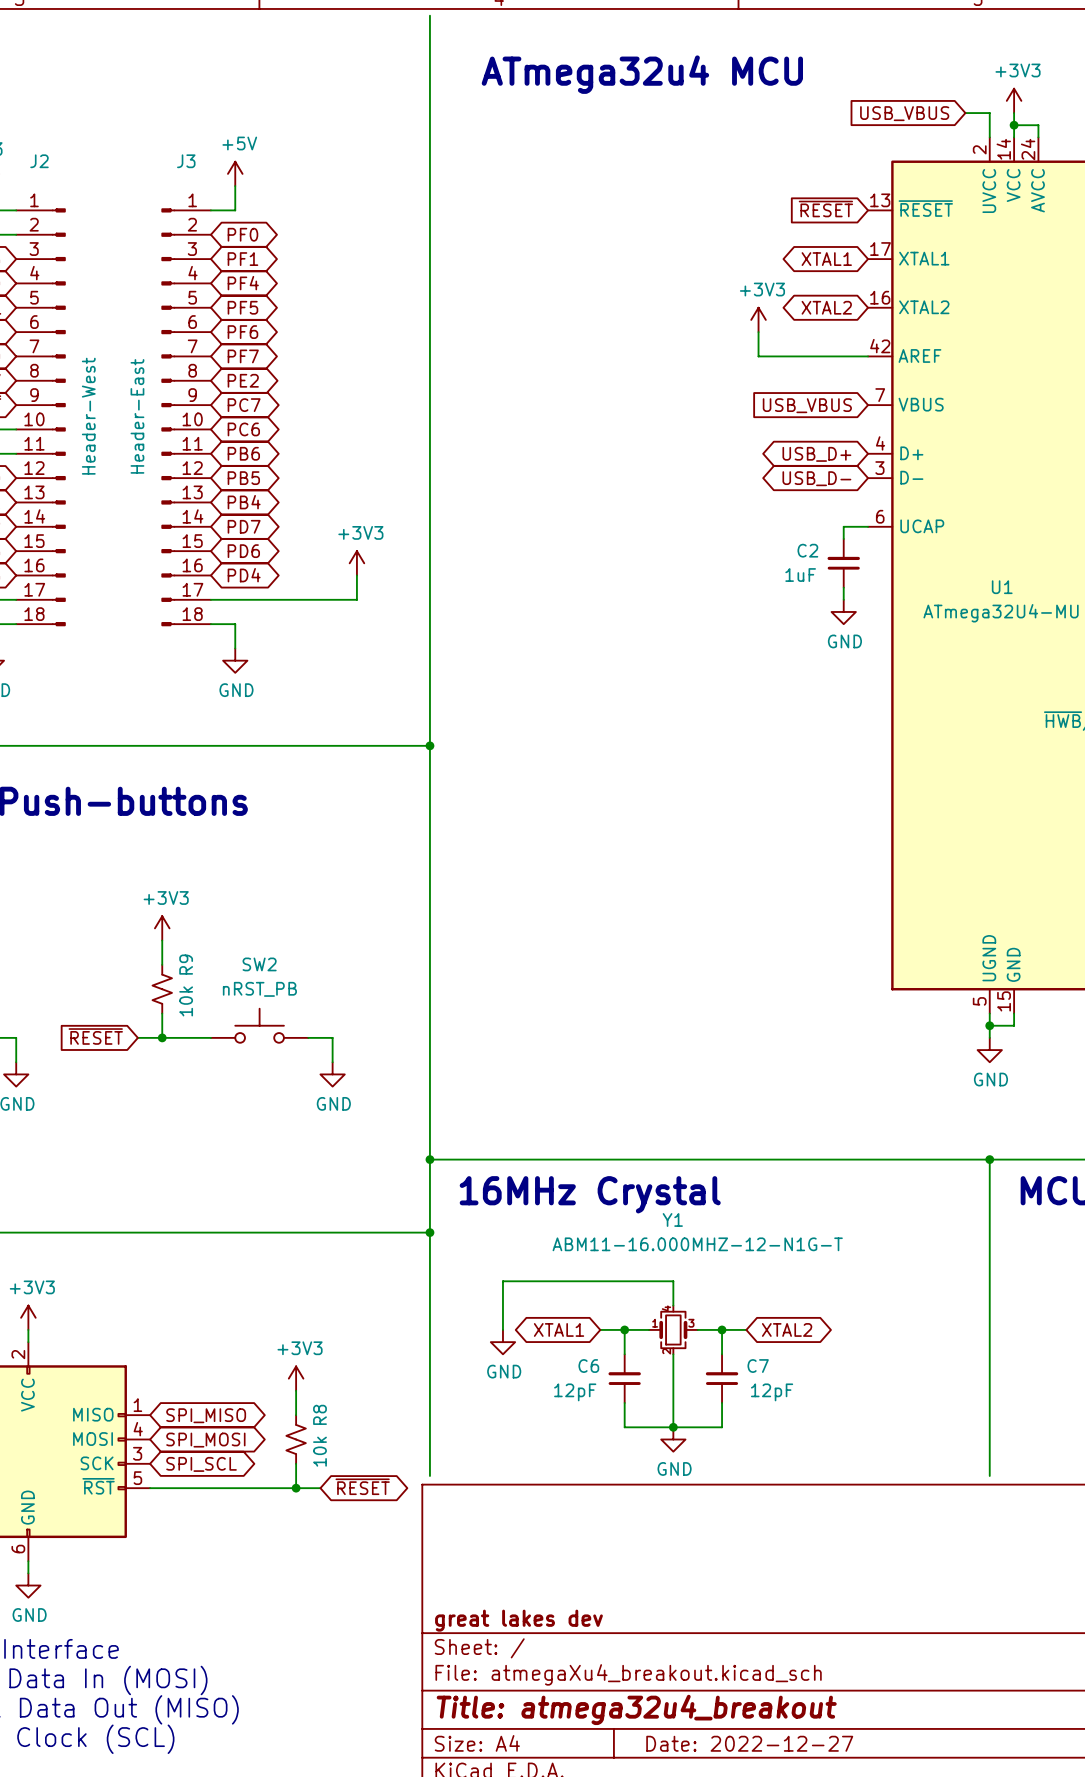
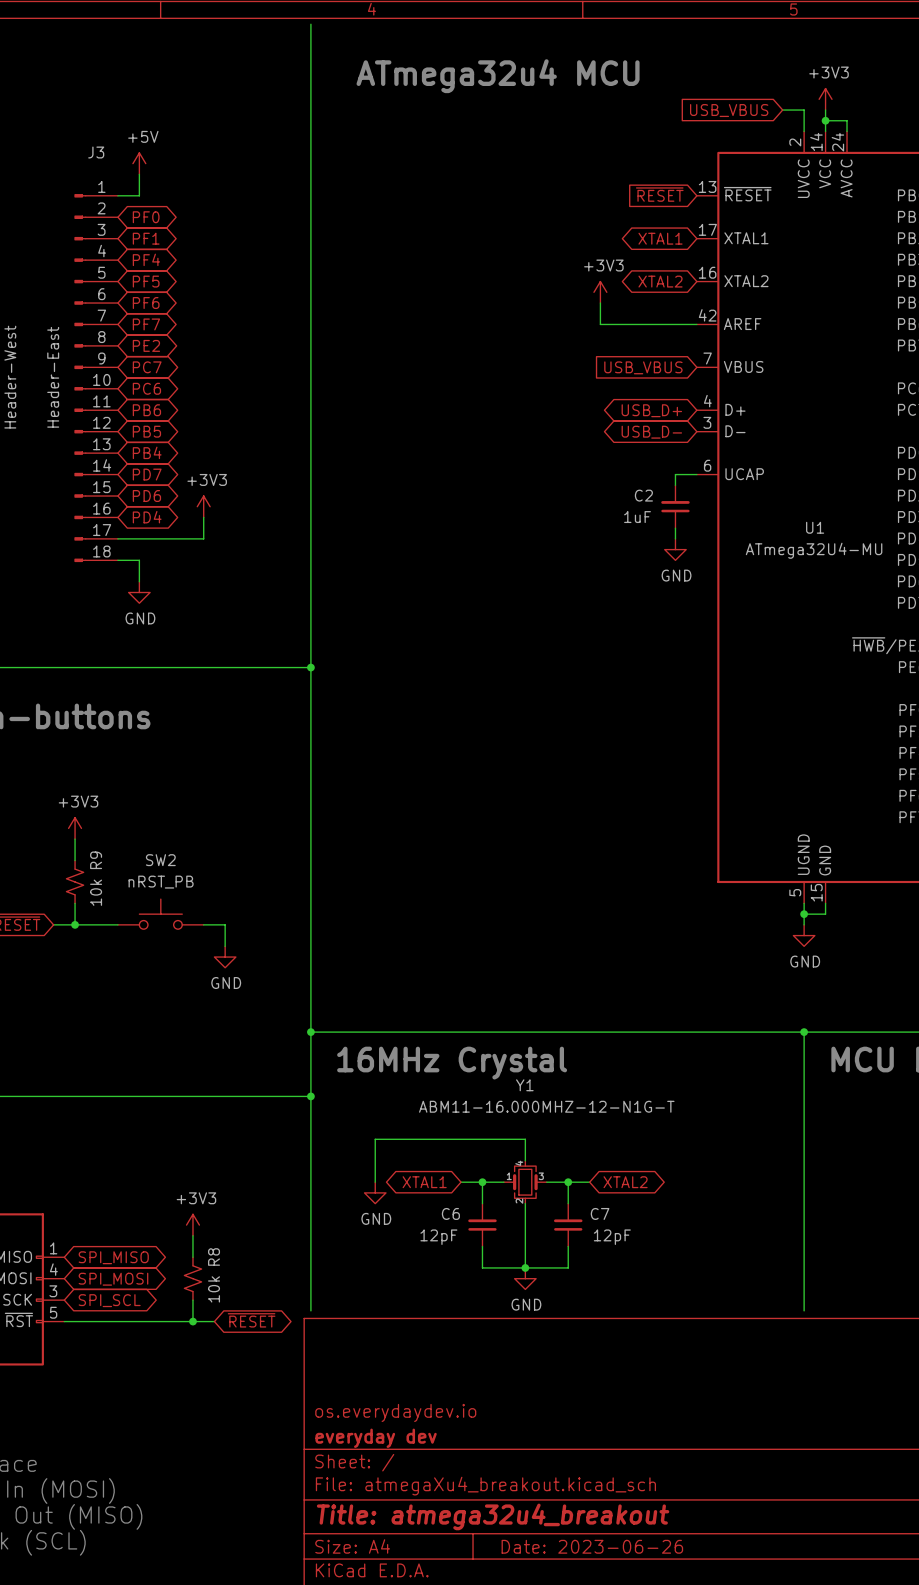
power symbol position: +3V3 (356, 563) -> +3V3 (203, 506)
wire: (356, 575) (356, 599) (308, 599) -> (203, 517) (203, 538)
title block: none -> os.everydaydev.io (395, 1412)
title block: great lakes dev (518, 1620) -> everyday dev (376, 1438)
title block: Date: 2022-12-27 (749, 1743) -> Date: 2023-06-26 (592, 1546)

